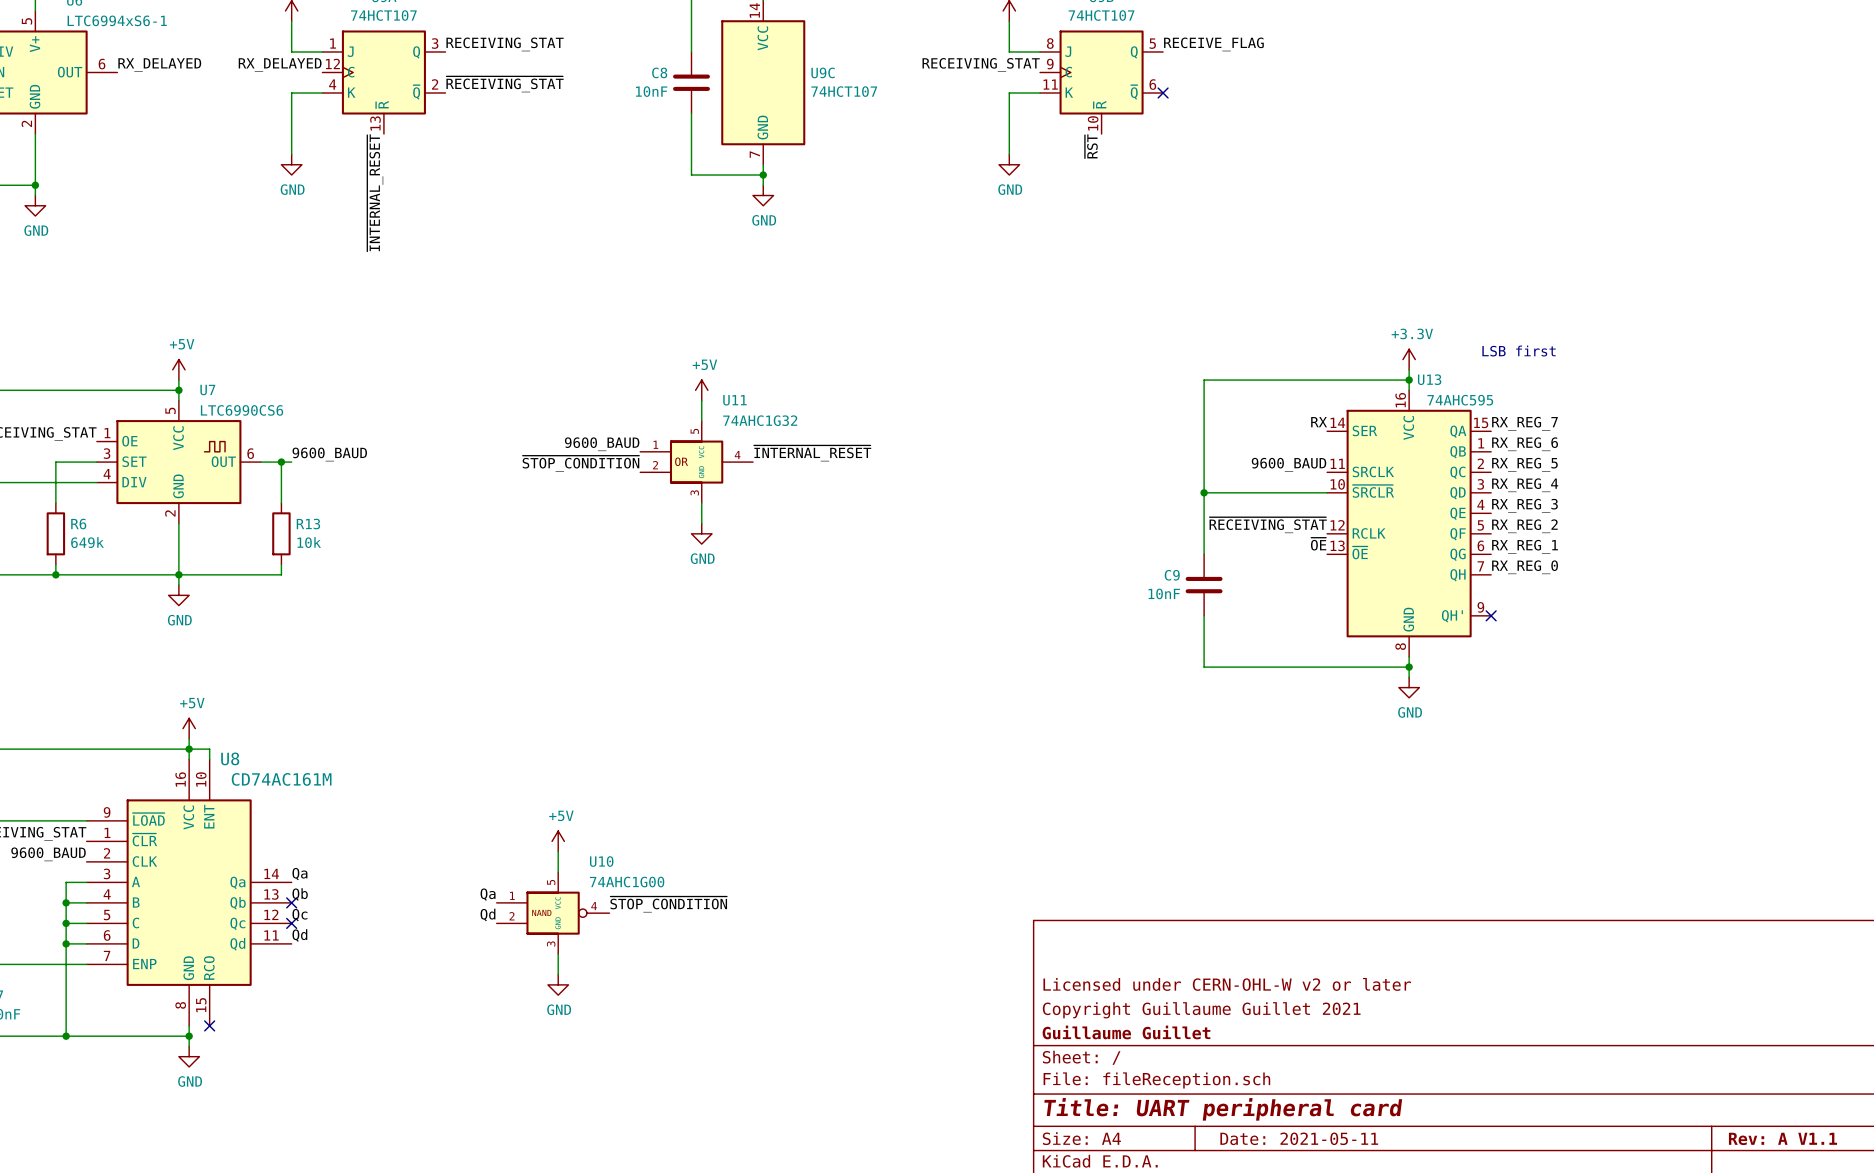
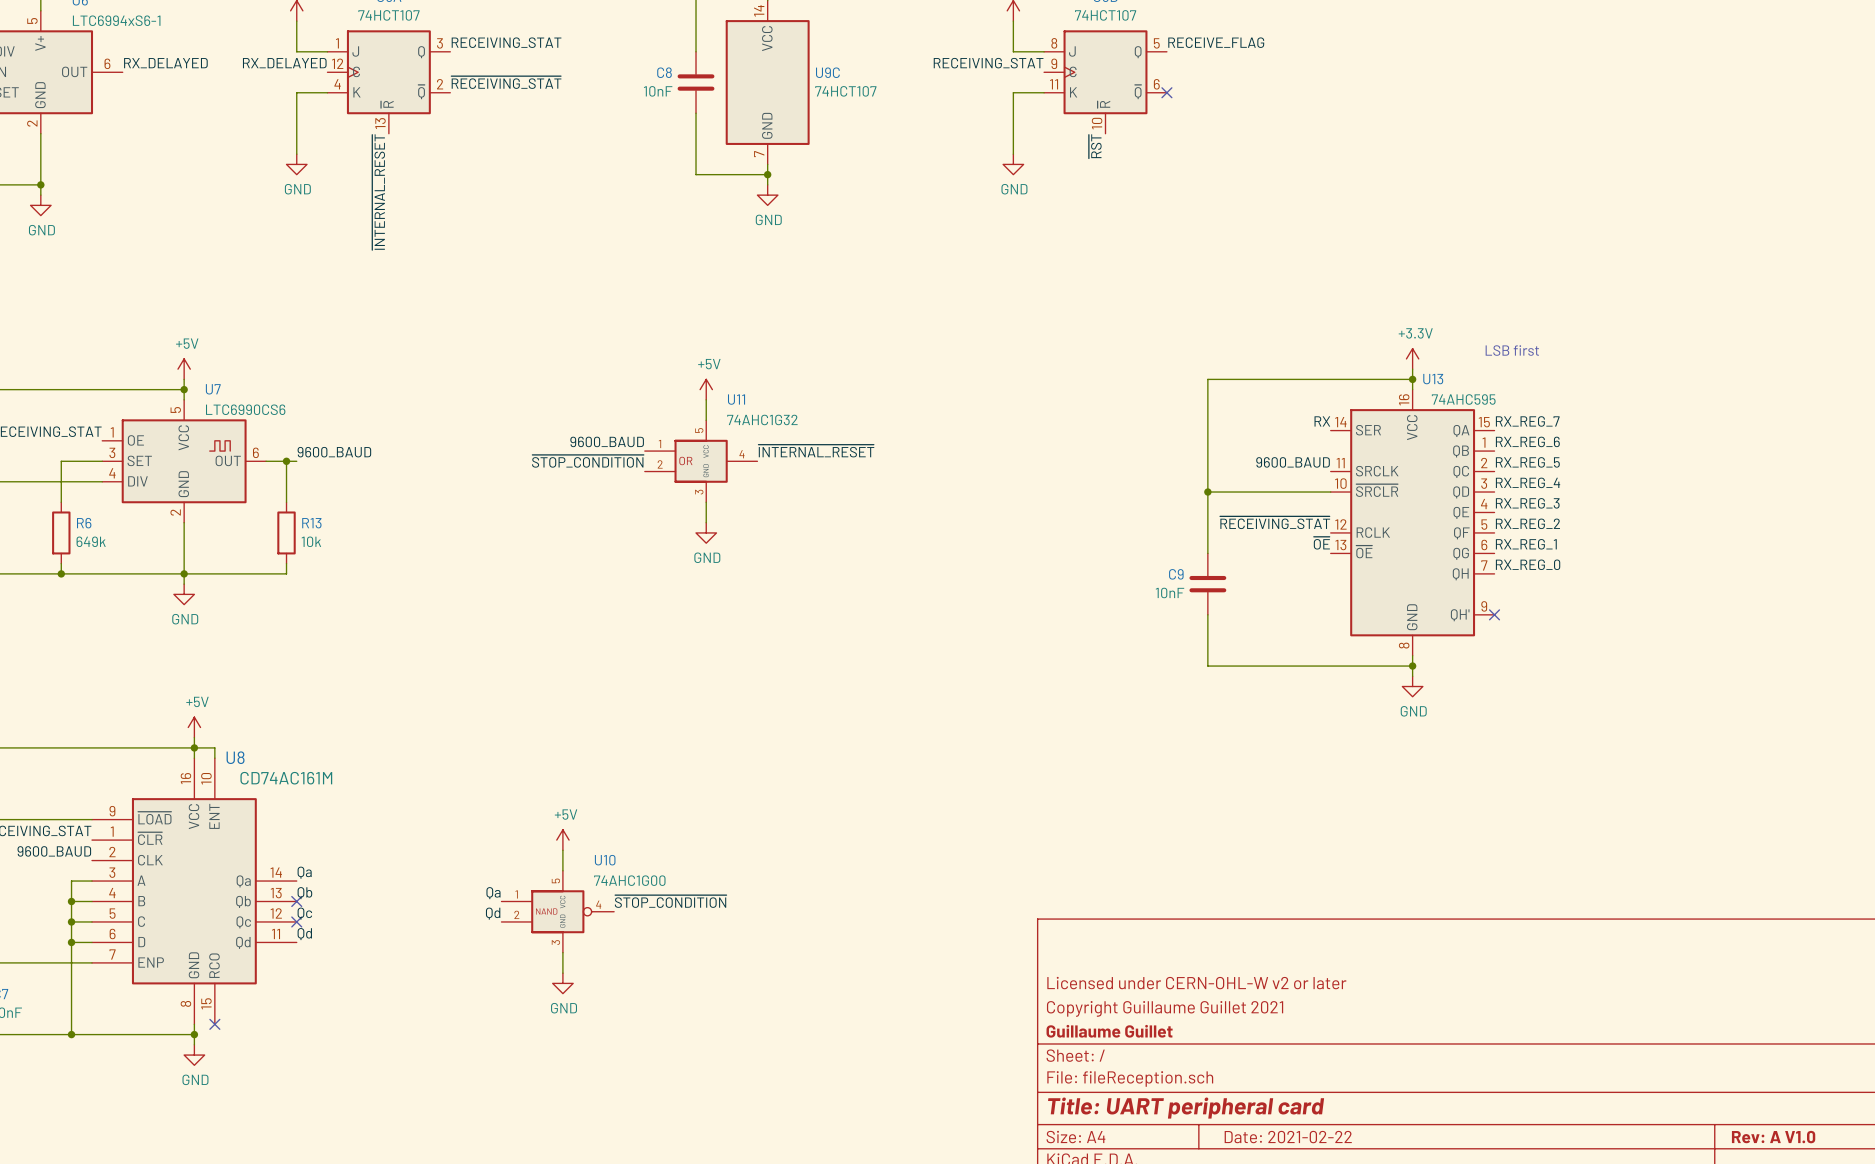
title block: Date: 2021-05-11 (1299, 1138) -> Date: 2021-02-22 (1288, 1137)
title block: Rev: A V1.1 (1782, 1138) -> Rev: A V1.0 (1773, 1137)

